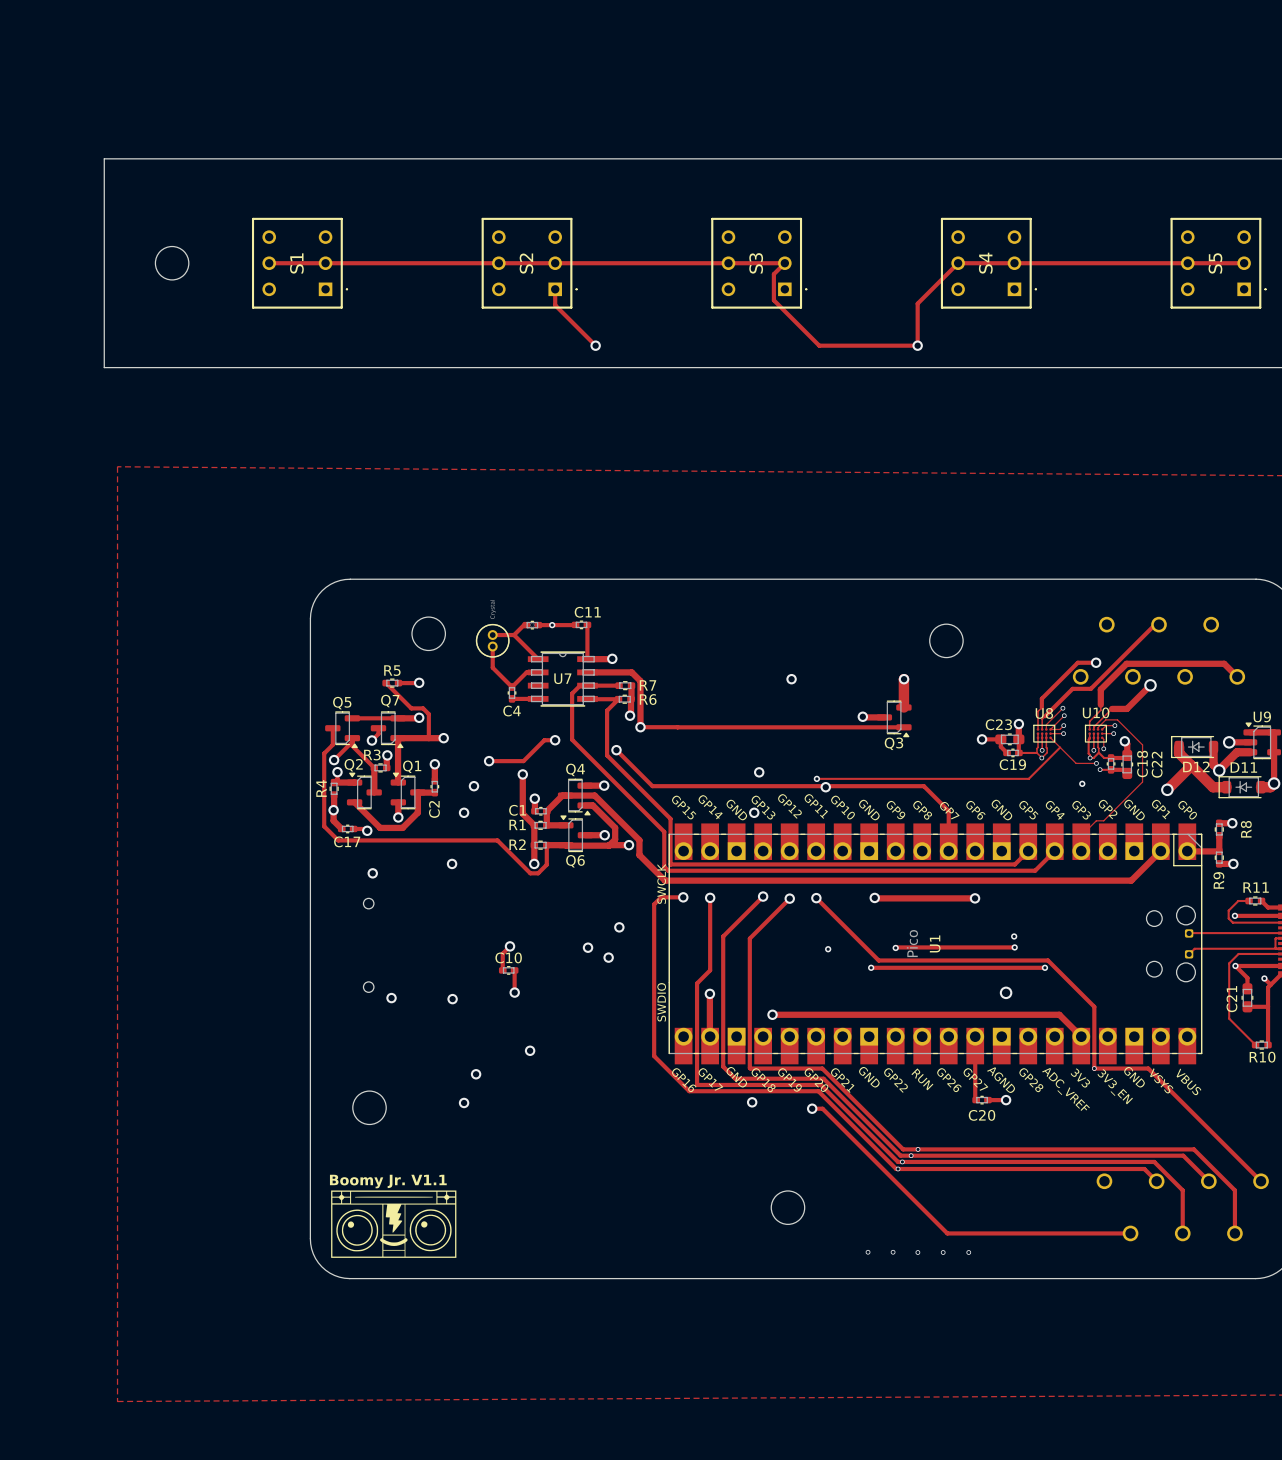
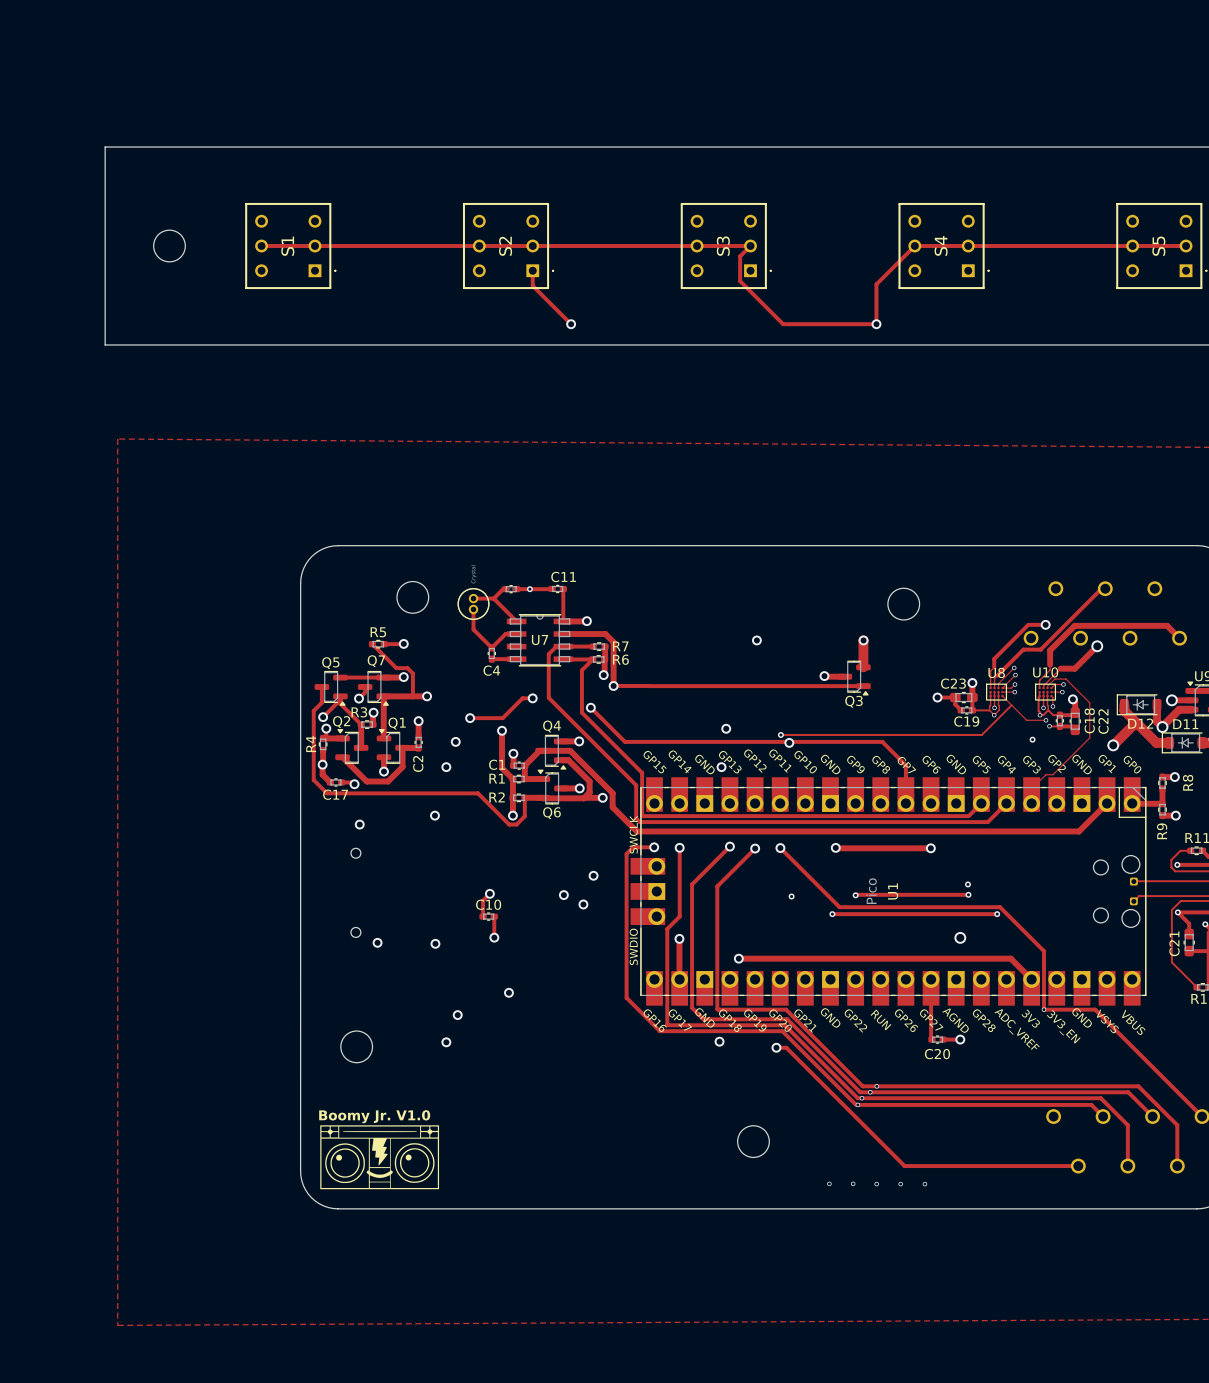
U1 footprint: [668, 823, 1203, 1065] -> [630, 777, 1147, 1006]
text: Boomy Jr. V1.1 (388, 1181) -> Boomy Jr. V1.0 (374, 1116)

